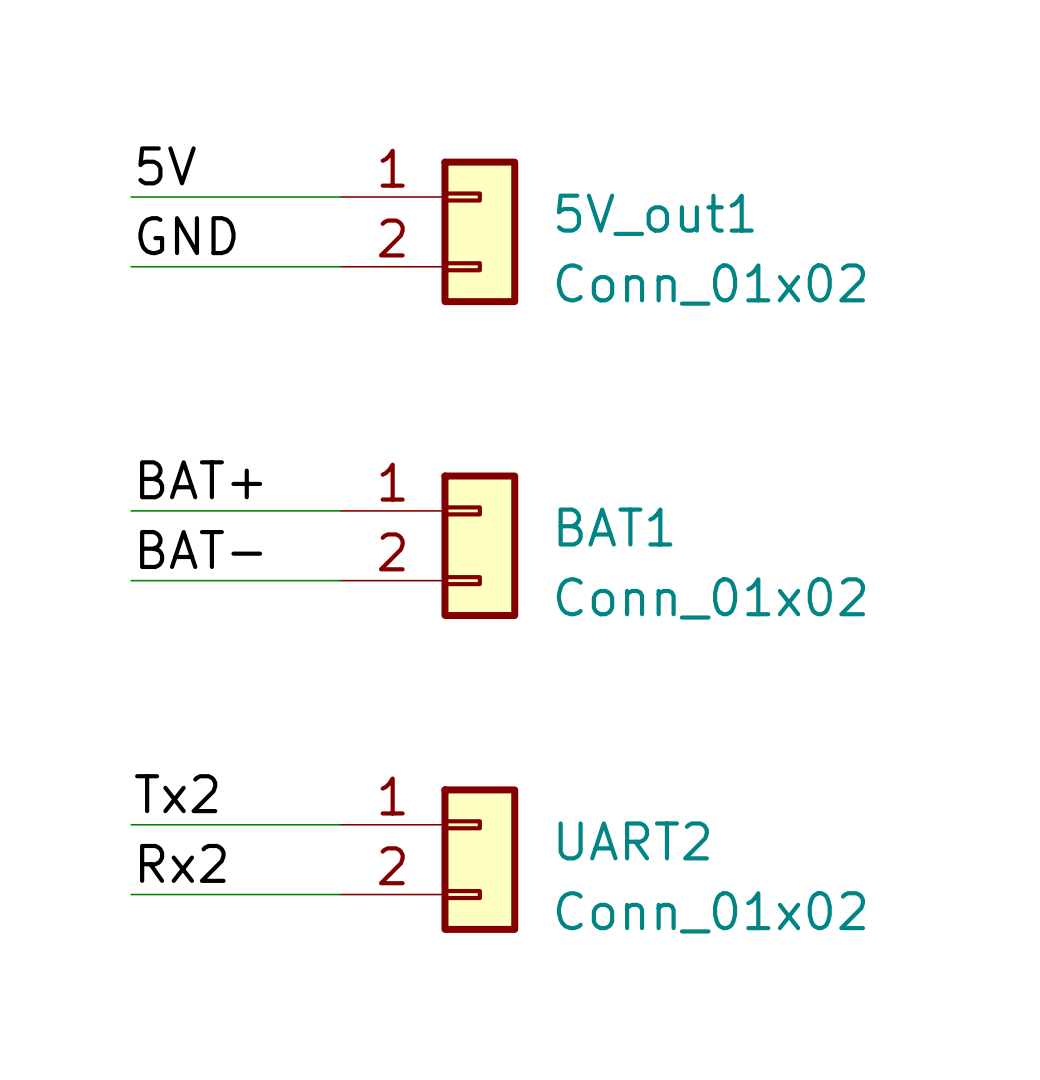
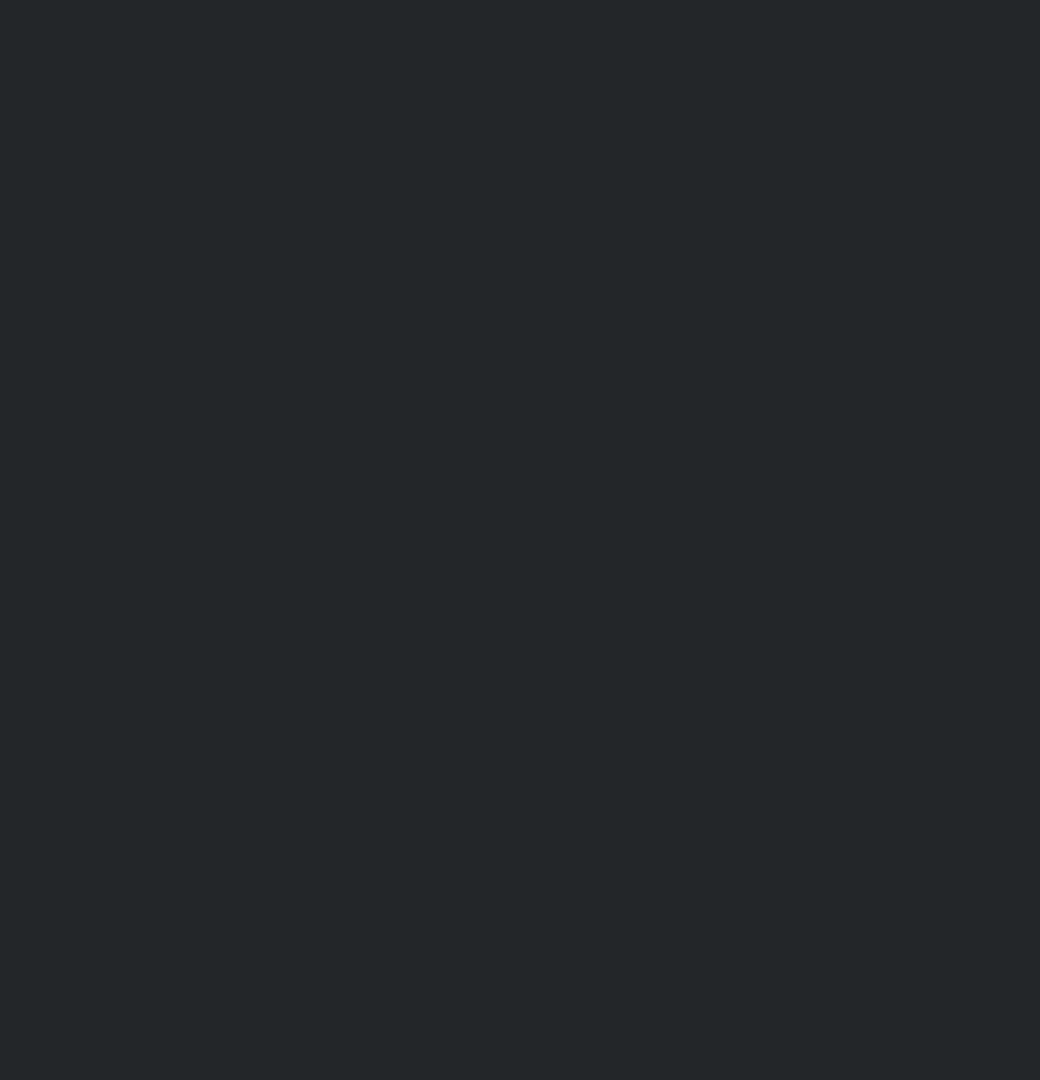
label: 5V (167, 165) -> none
wire: (131, 197) (340, 197) -> none
5V_out1: Conn_01x02 (429, 231) -> none
label: GND (186, 235) -> none
wire: (131, 266) (340, 266) -> none
label: BAT+ (201, 479) -> none
wire: (131, 510) (340, 510) -> none
BAT1: Conn_01x02 (429, 545) -> none
label: BAT- (201, 549) -> none
wire: (131, 580) (340, 580) -> none
label: Tx2 (176, 793) -> none
wire: (131, 824) (340, 824) -> none
UART2: Conn_01x02 (429, 859) -> none
label: Rx2 (182, 863) -> none
wire: (131, 894) (340, 894) -> none

